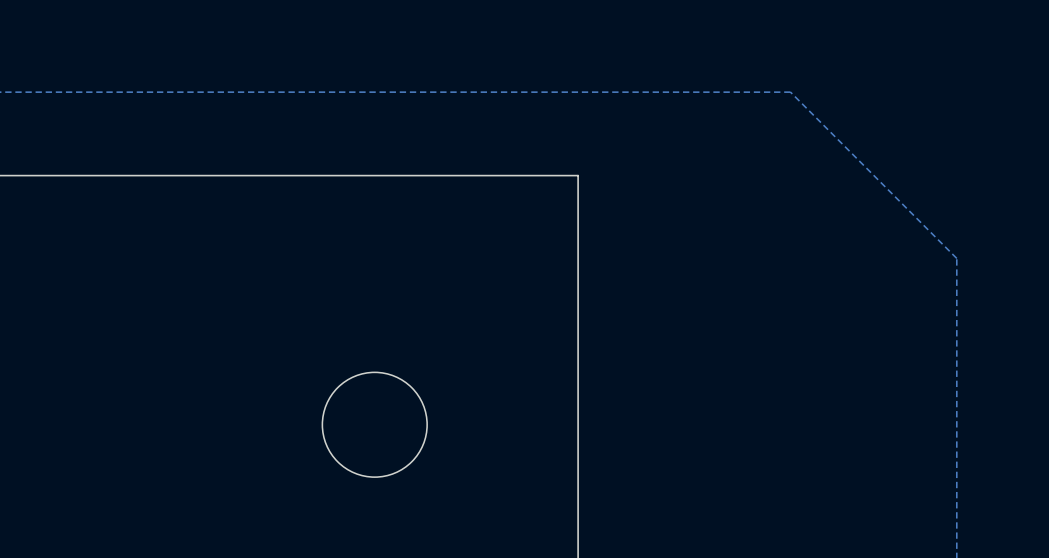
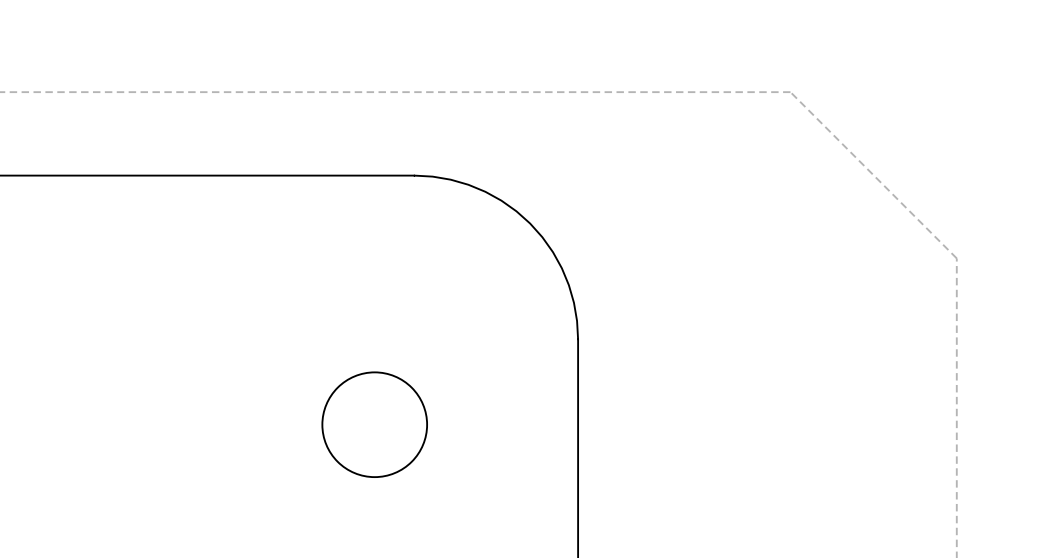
board edge: (414, 175) (578, 175) (578, 339) -> (414, 175) (450, 179) (485, 191) (516, 211) (530, 223) (542, 237) (561, 268) (573, 302) (578, 339)

